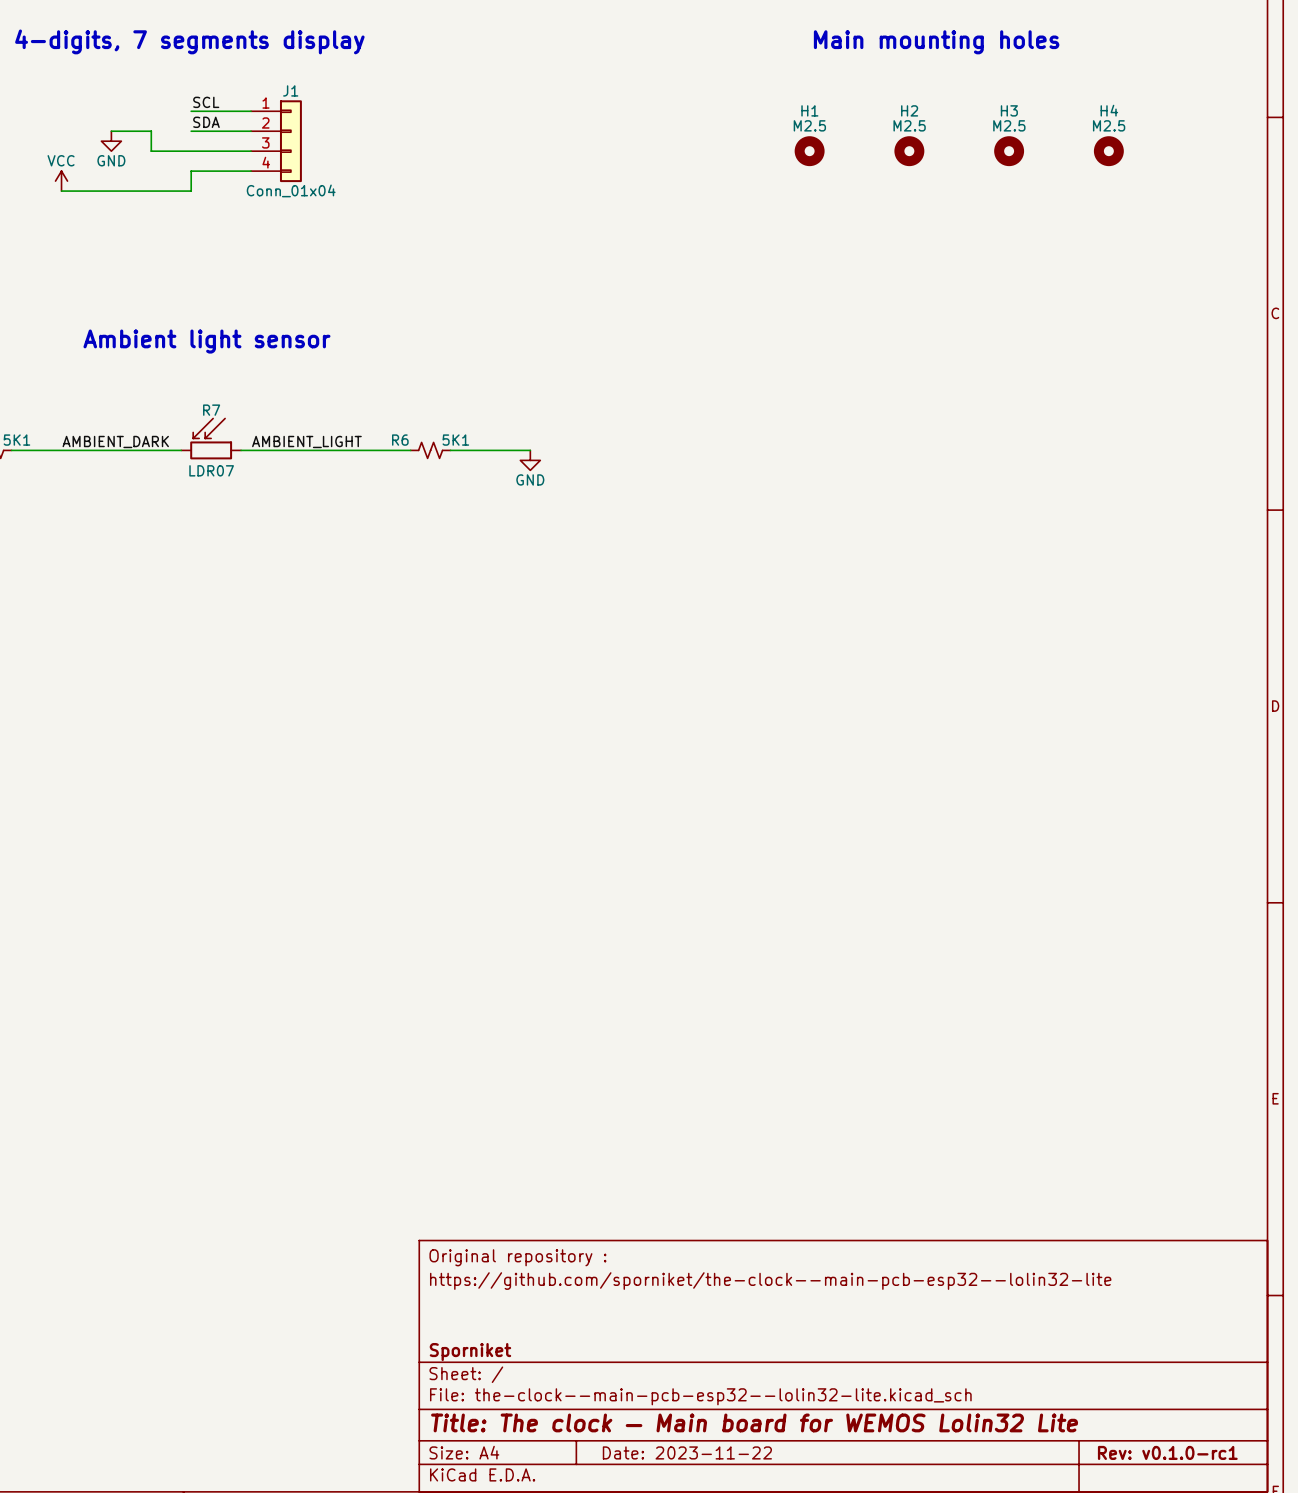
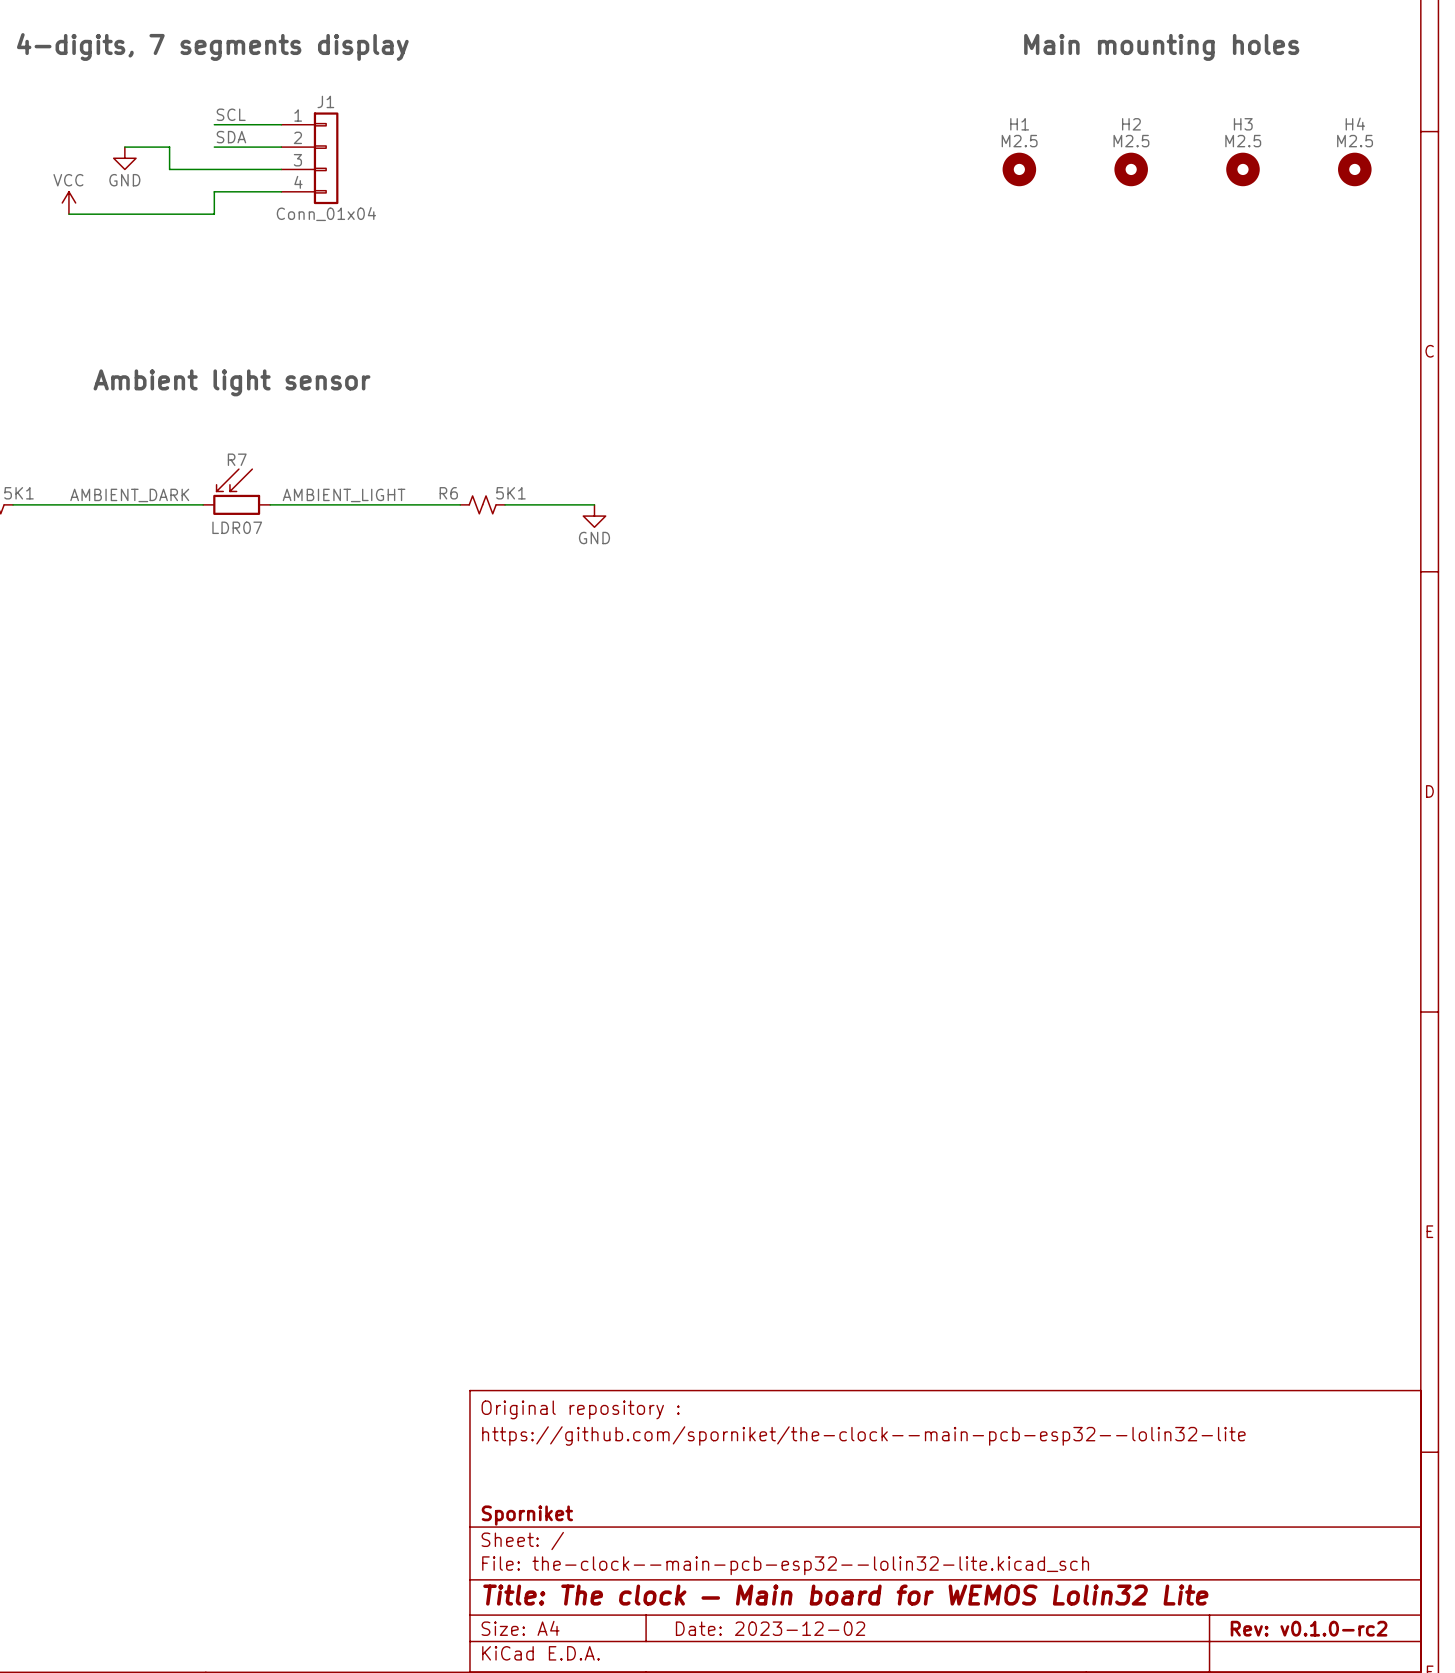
text position: Main mounting holes (936, 42) -> Main mounting holes (1161, 47)
H2 name: H2 (909, 110) -> H1 (1019, 124)
H3 name: H3 (1009, 110) -> H2 (1131, 124)
H4 name: H4 (1109, 110) -> H3 (1243, 124)
H1: M2.5 (809, 151) -> none
H4: none -> M2.5 (1354, 169)
title block: Date: 2023-11-22 (687, 1452) -> Date: 2023-12-02 (770, 1628)
title block: Rev: v0.1.0-rc1 (1167, 1452) -> Rev: v0.1.0-rc2 (1309, 1628)

